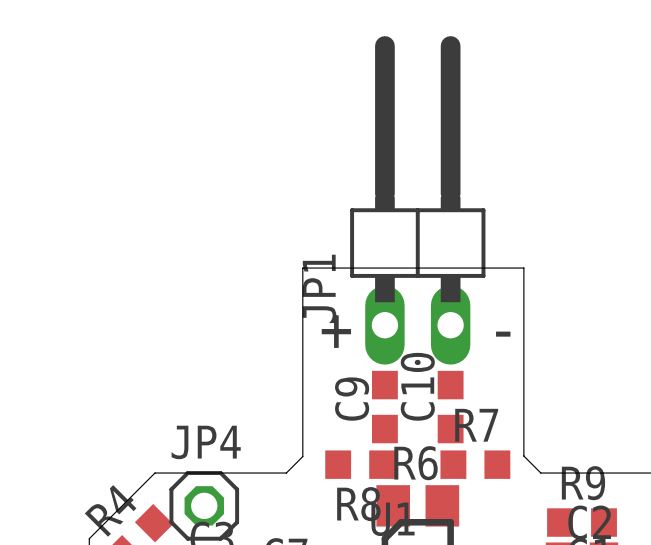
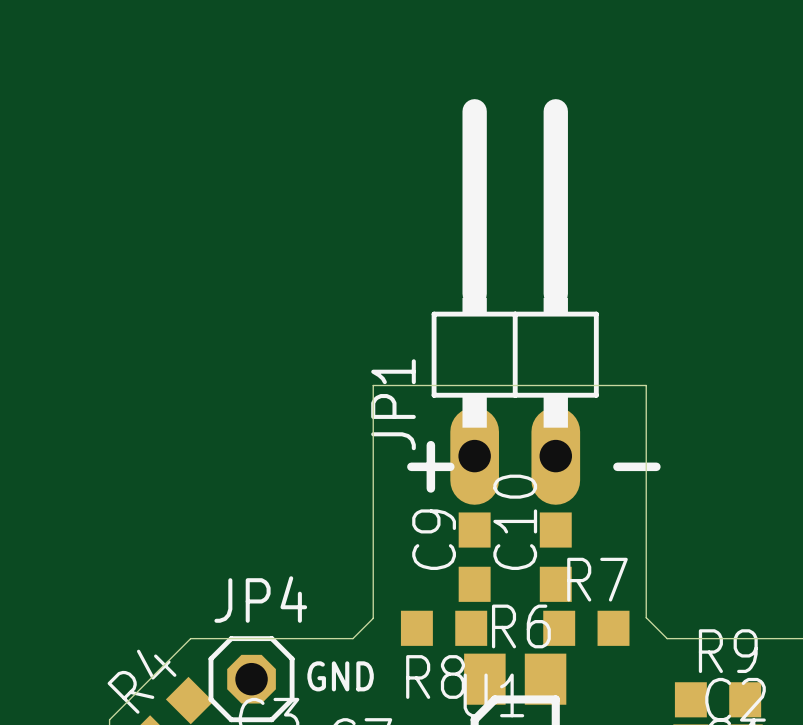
text: none -> GND (340, 676)

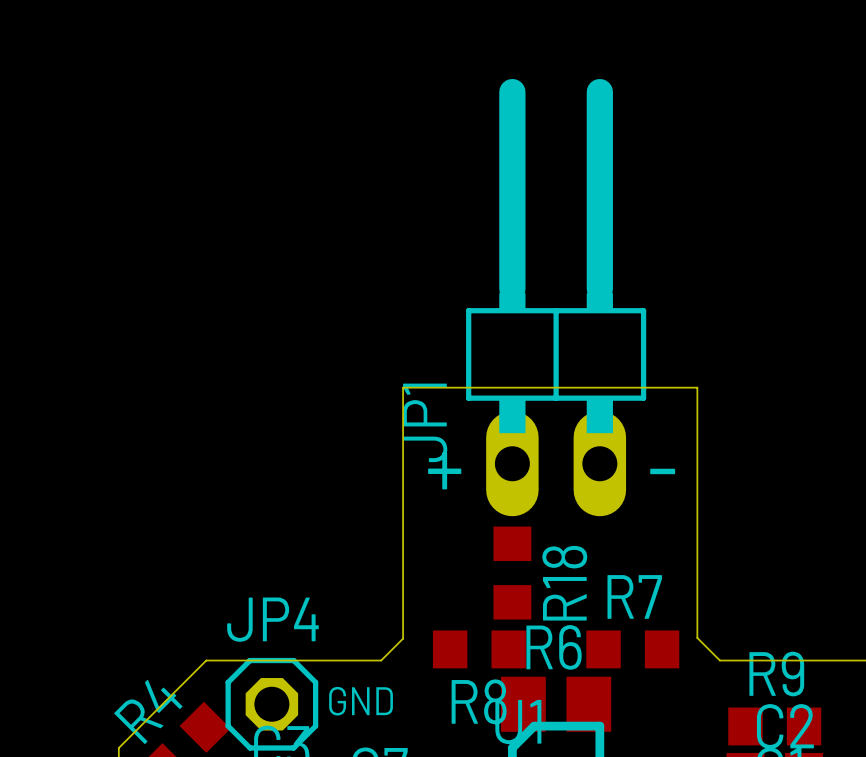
C9: (474, 557) -> none
R18: none -> (512, 573)
C10: (555, 557) -> none

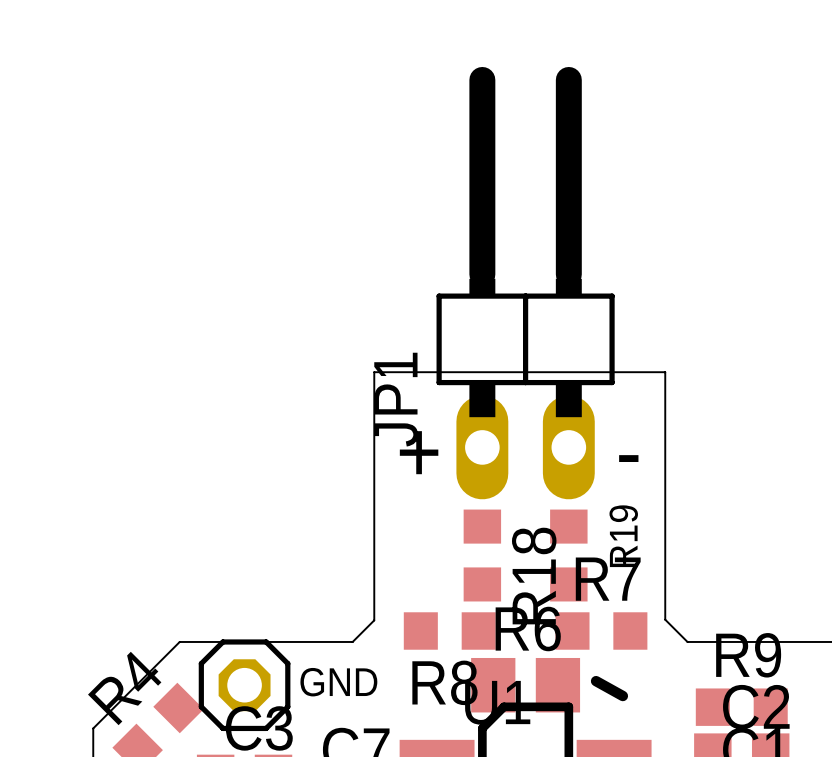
R19: none -> (568, 555)
JP4 name: JP4 (272, 619) -> none
line: none -> (596, 681) (622, 696)

